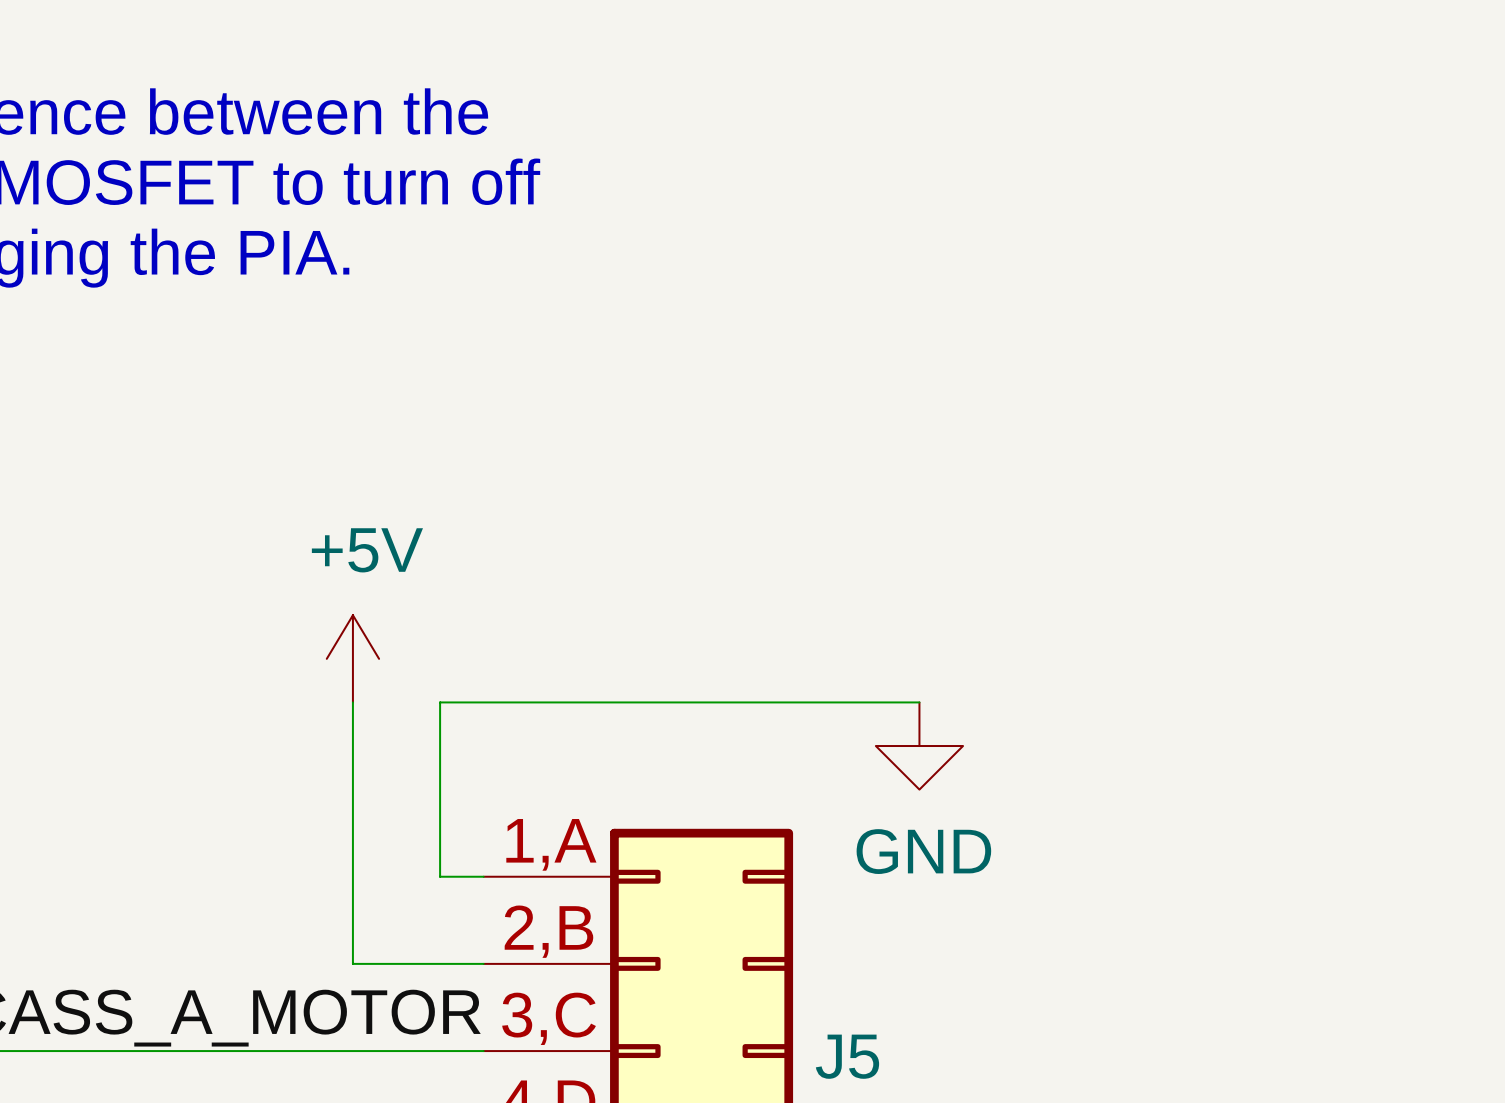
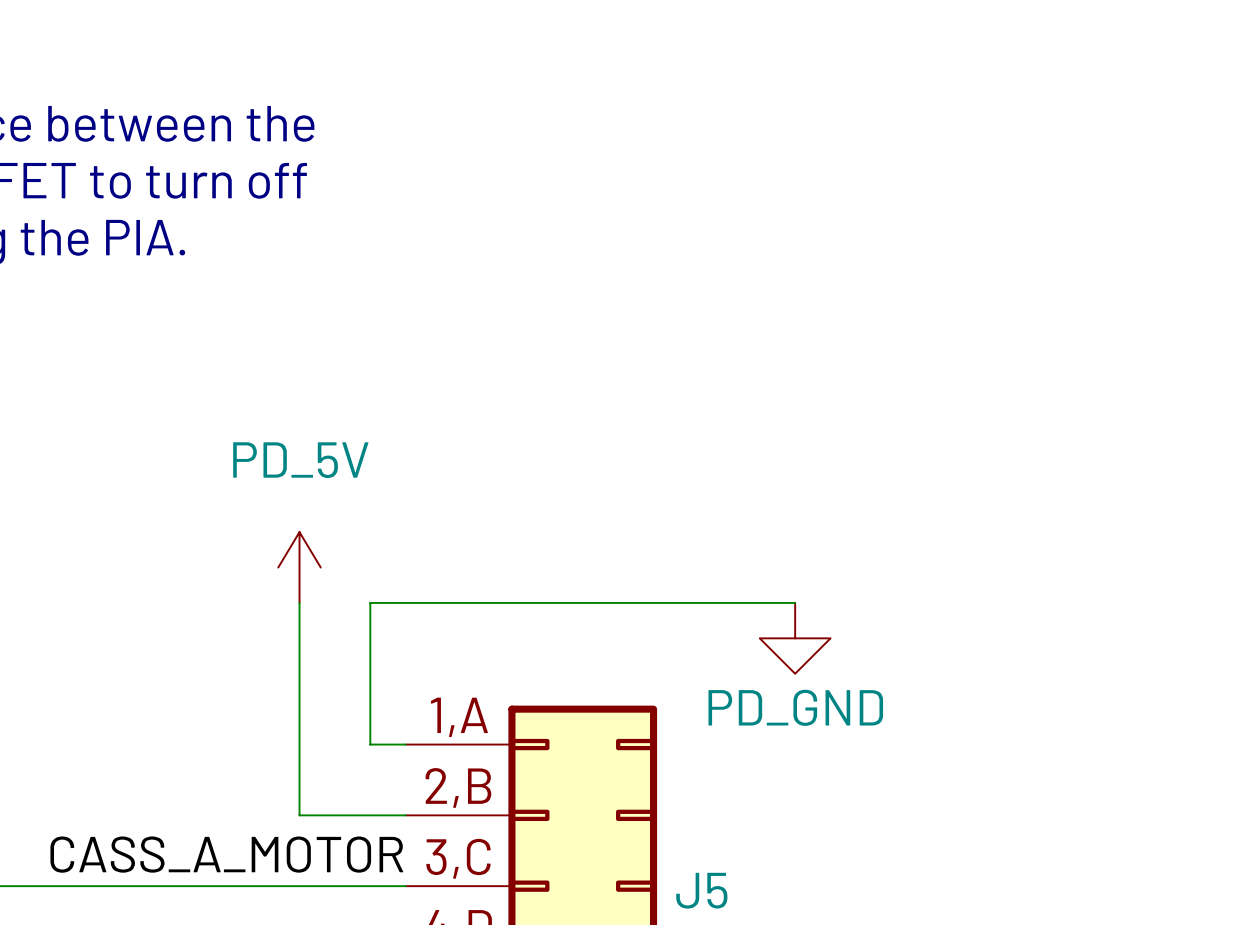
power symbol: +5V (352, 658) -> PD_5V (299, 567)
wire: none -> (759, 602) (795, 602)
power symbol: GND (919, 746) -> none
power symbol: none -> PD_GND (795, 638)

